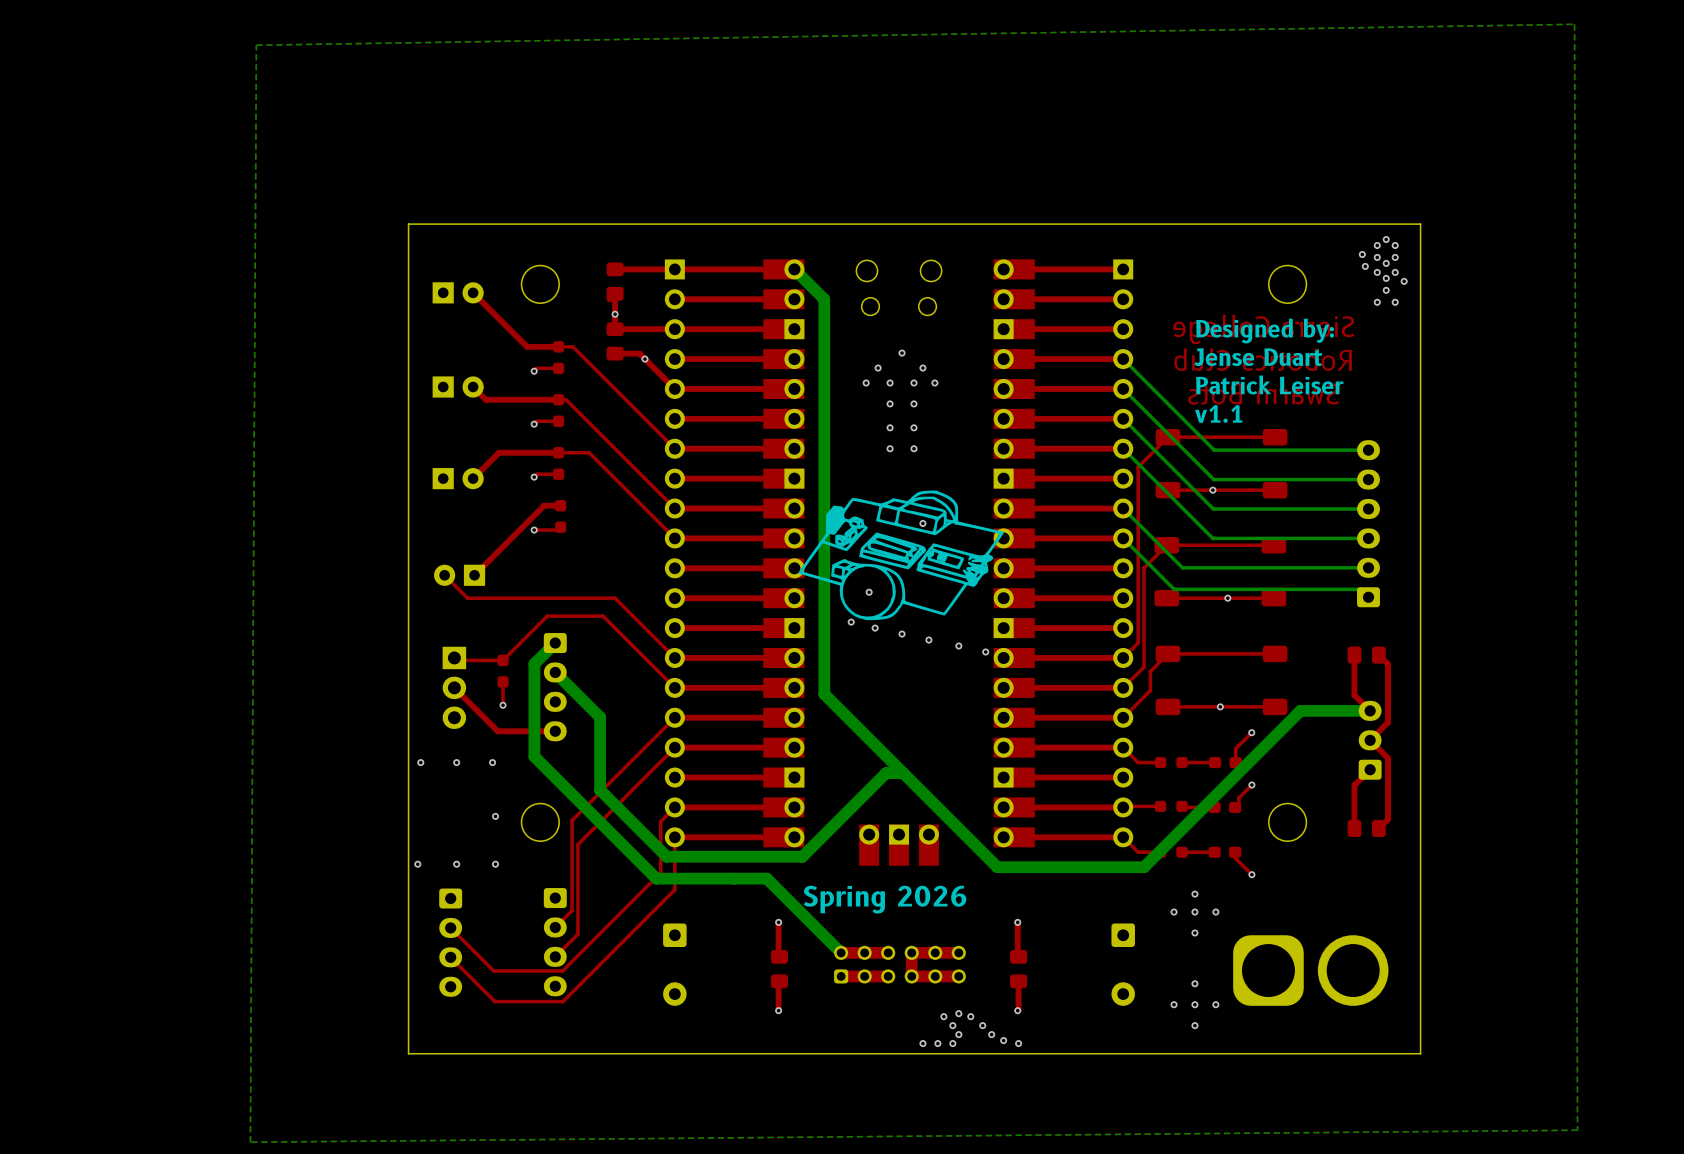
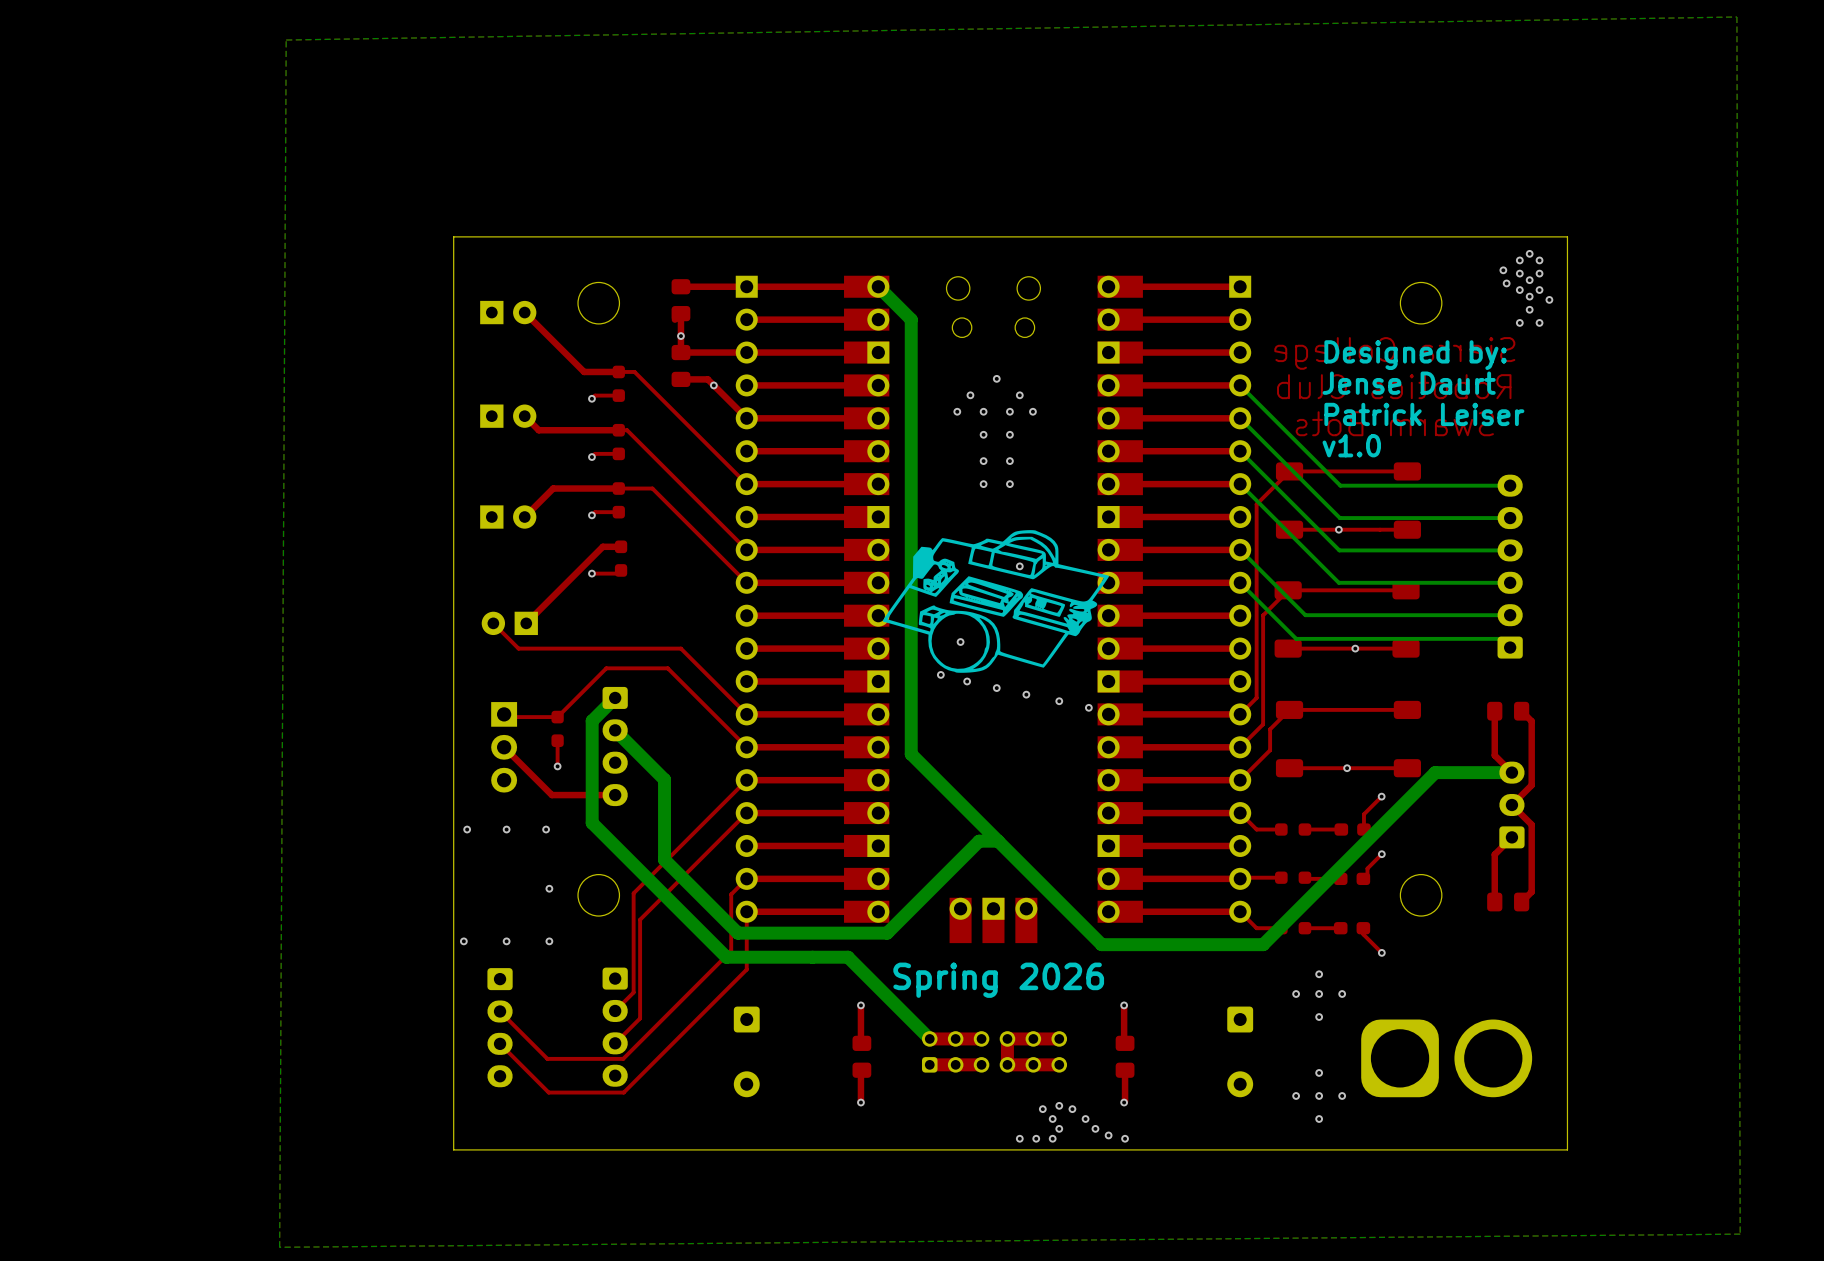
text: Jense Duart (1258, 357) -> Jense Daurt (1409, 383)
text: v1.1 (1218, 414) -> v1.0 (1351, 445)

